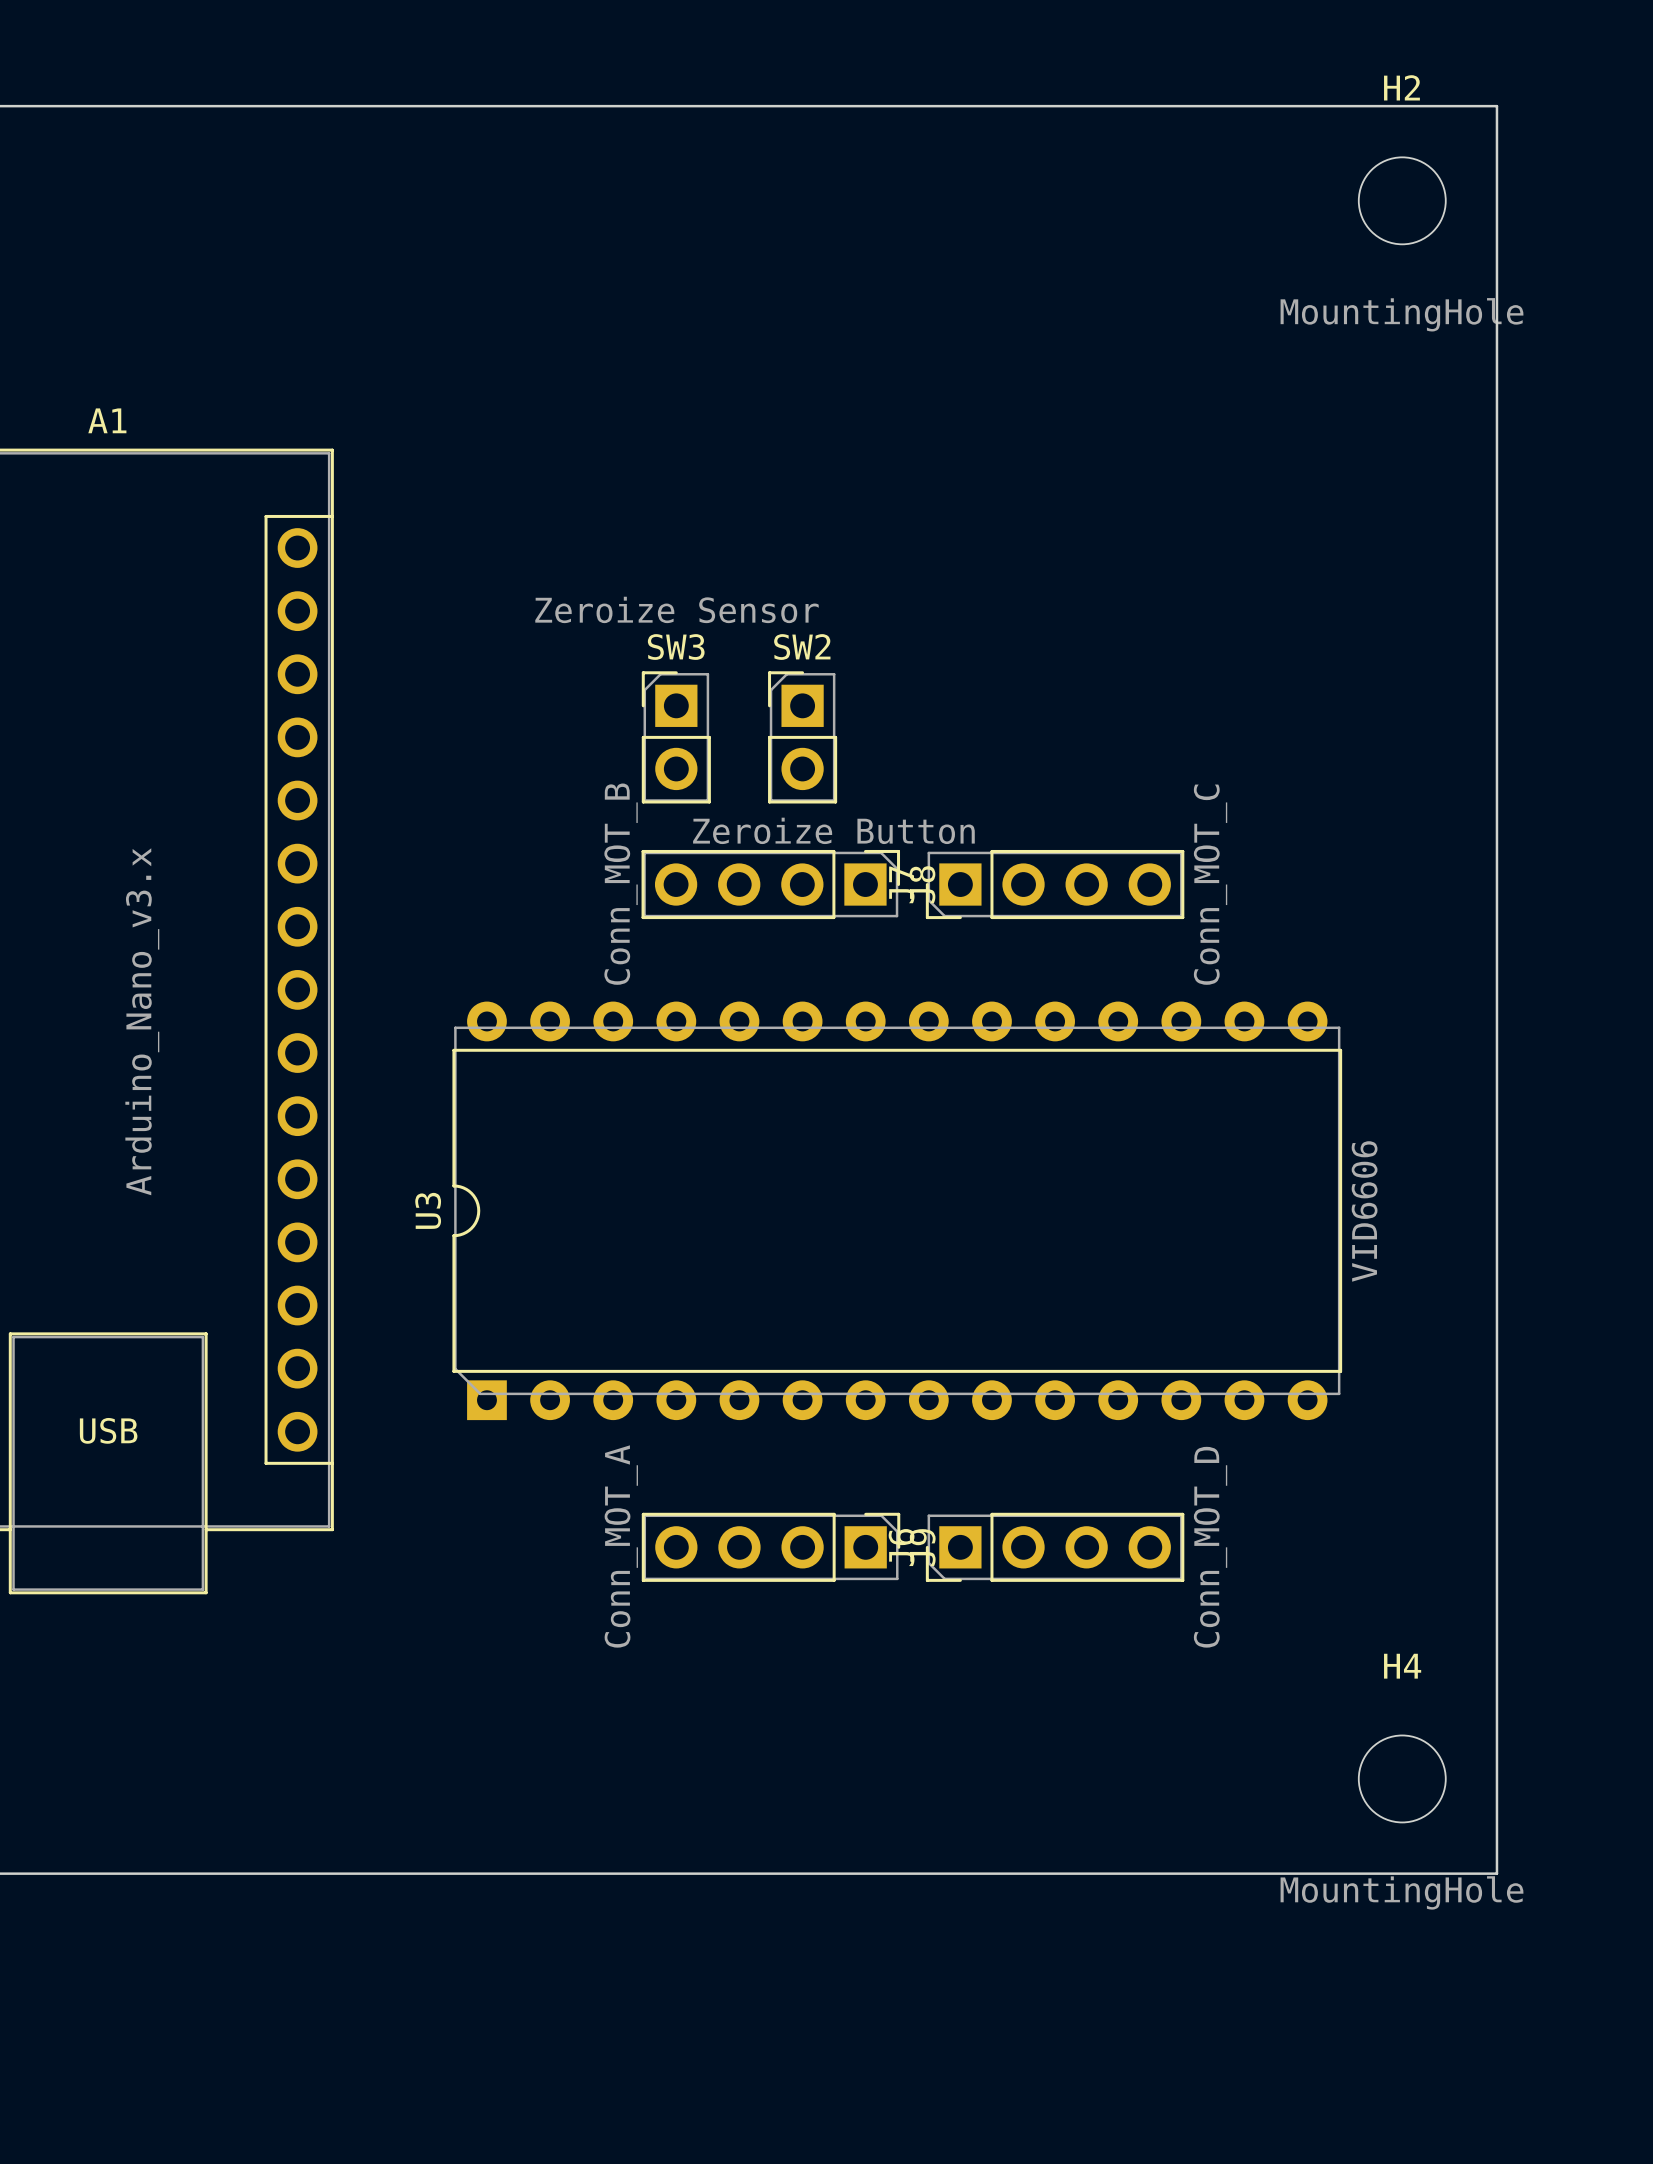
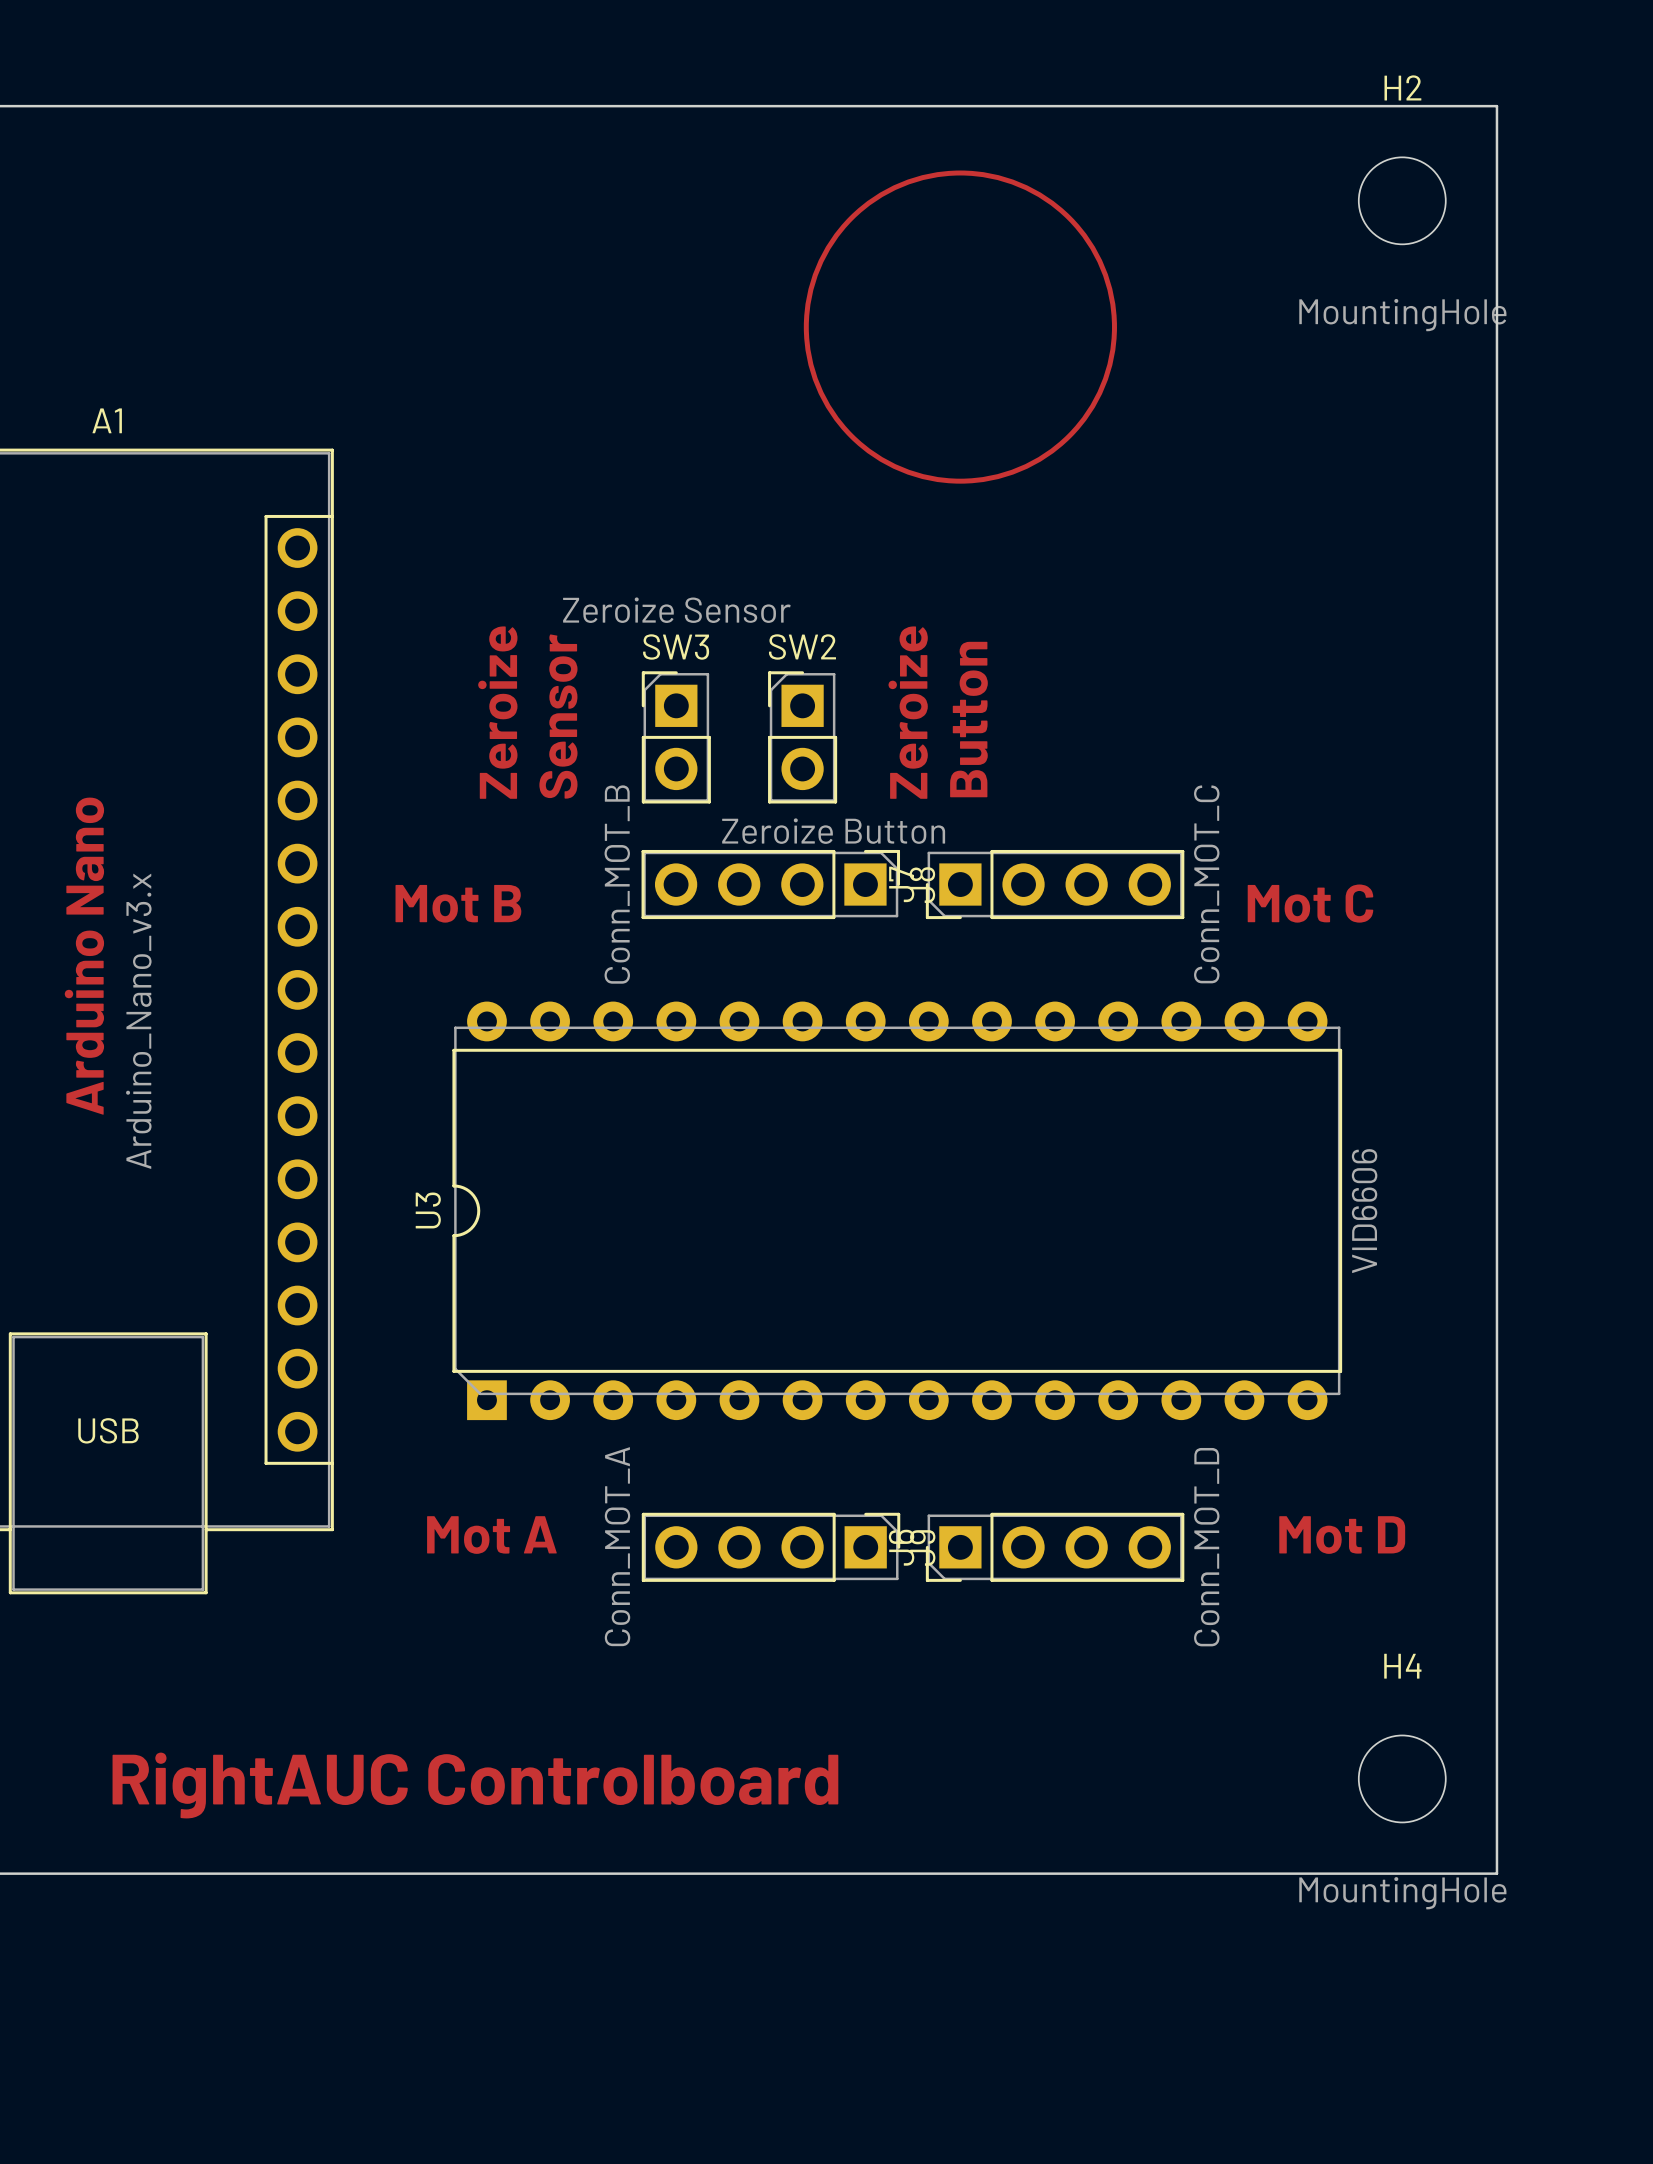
drawing: none -> [803, 170, 1117, 484]
text: none -> Zeroize (497, 712)
text: none -> Zeroize (908, 712)
text: none -> Sensor (558, 716)
text: none -> Button (968, 719)
text: none -> Mot B (458, 903)
text: none -> Mot C (1310, 903)
text: none -> Arduino Nano (84, 956)
text: none -> Mot A (491, 1535)
text: none -> Mot D (1342, 1535)
text: none -> RightAUC Controlboard (475, 1785)

